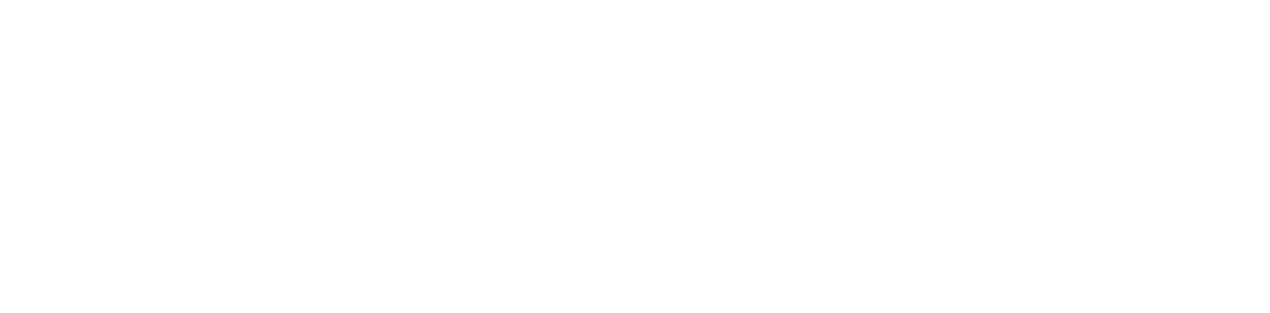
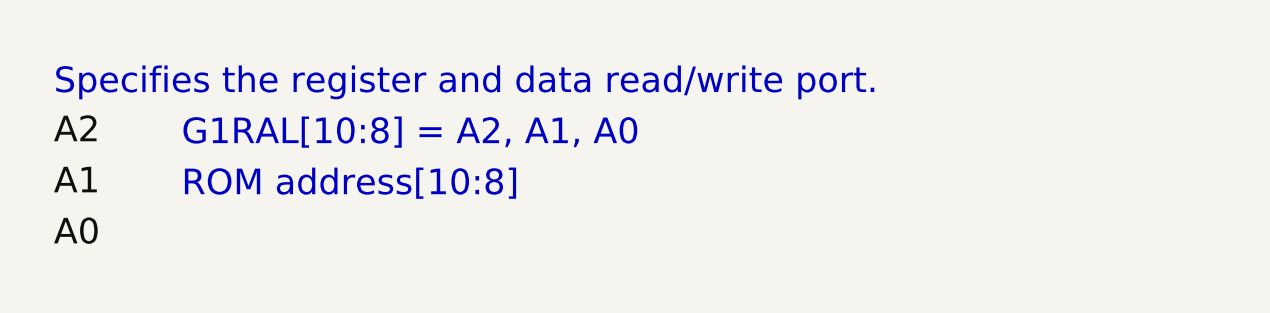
text: none -> Specifies the register and data read/write port. (465, 82)
label: none -> A2 (75, 128)
text: none -> G1RAL[10:8] = A2, A1, A0 (410, 132)
label: none -> A1 (75, 179)
text: none -> ROM address[10:8] (350, 183)
label: none -> A0 (75, 230)

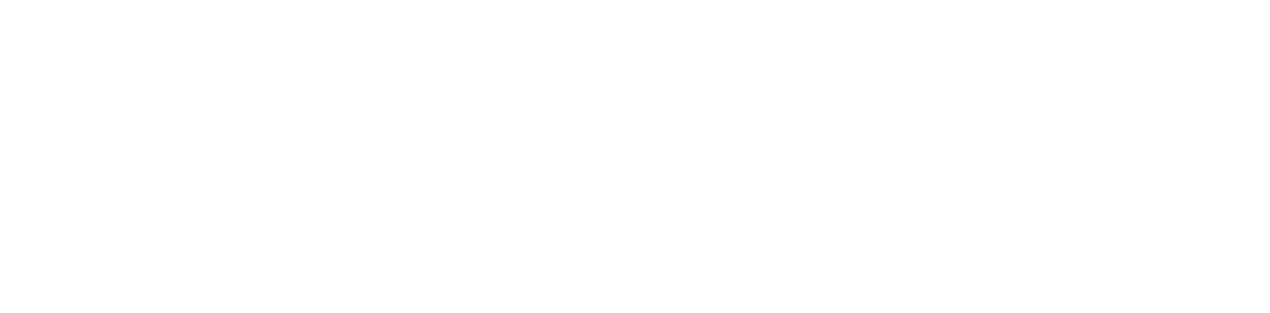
text: Specifies the register and data read/write port. (465, 82) -> none
label: A2 (75, 128) -> none
text: G1RAL[10:8] = A2, A1, A0 (410, 132) -> none
label: A1 (75, 179) -> none
text: ROM address[10:8] (350, 183) -> none
label: A0 (75, 230) -> none

